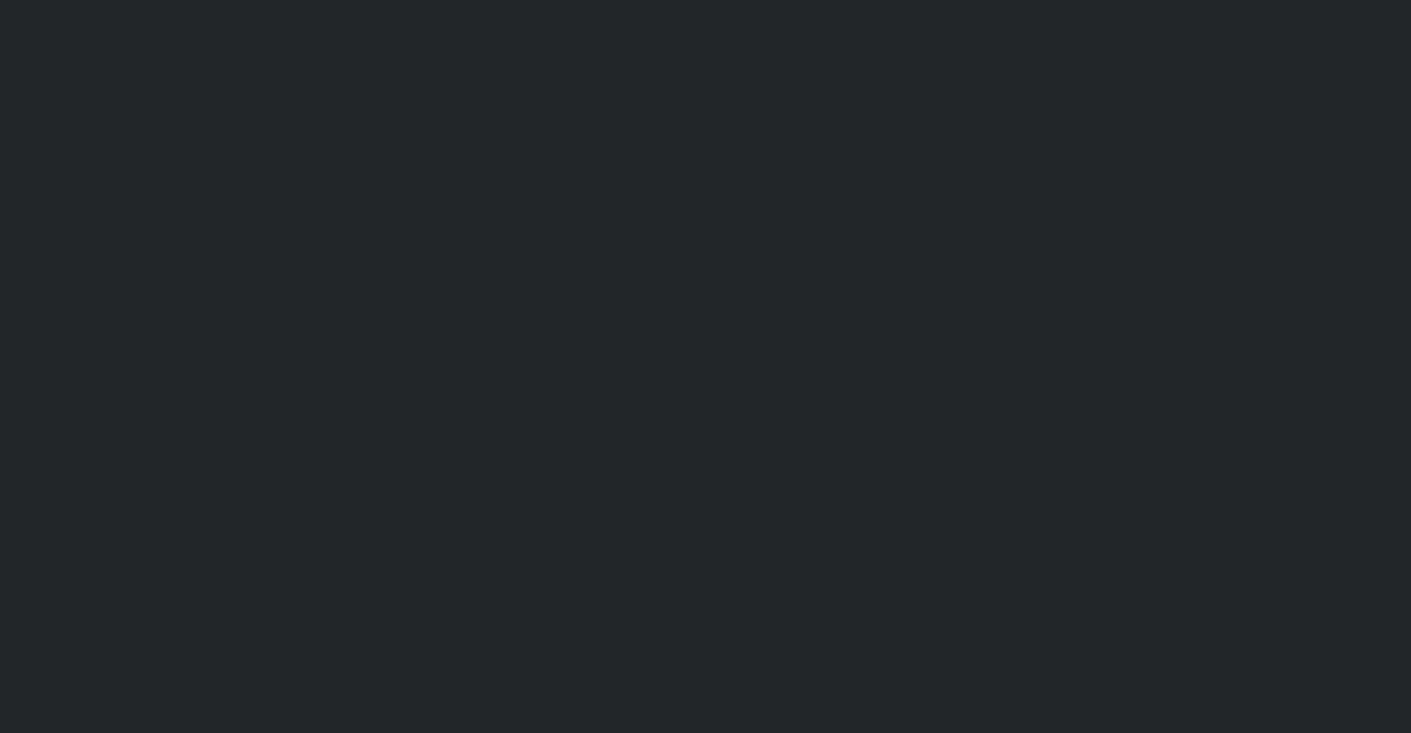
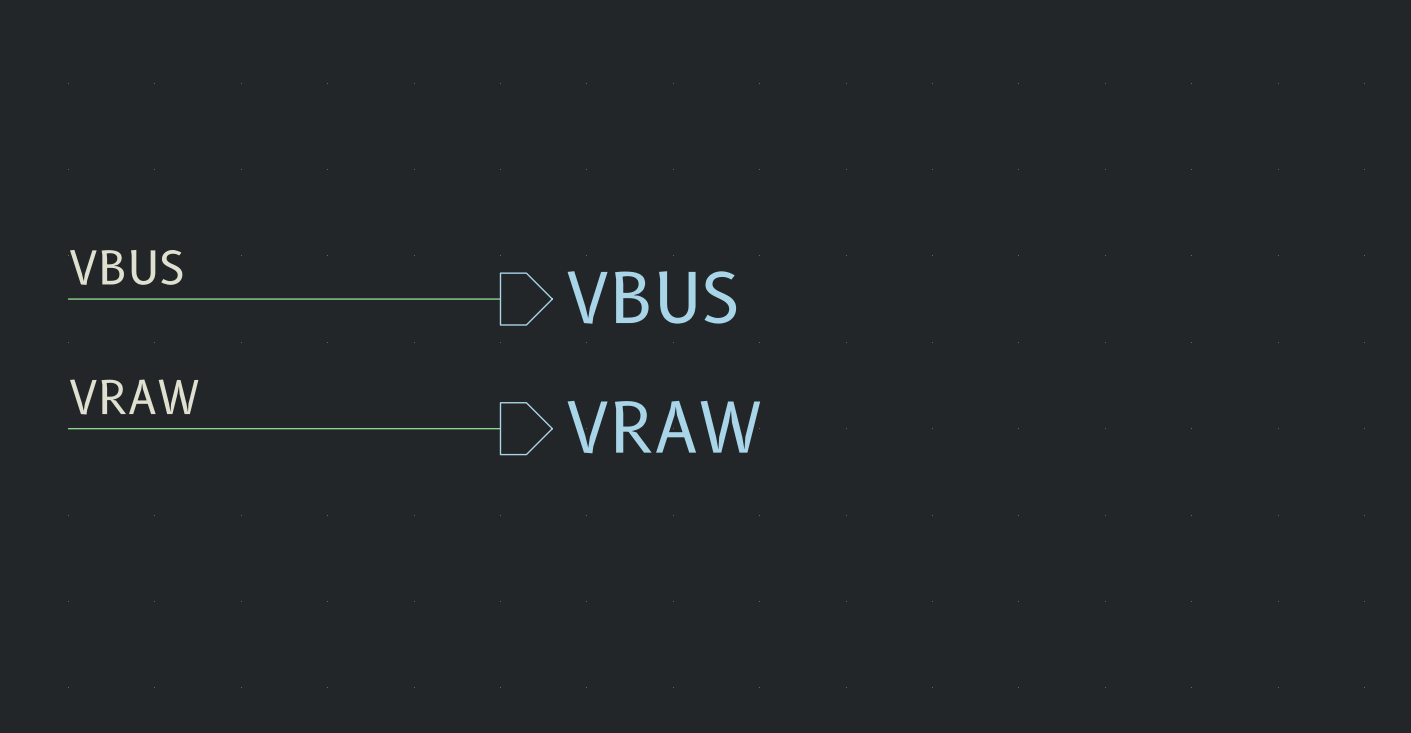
label: none -> VBUS (126, 267)
sheet pin: none -> VBUS (651, 297)
wire: none -> (68, 299) (500, 299)
label: none -> VRAW (134, 397)
sheet pin: none -> VRAW (663, 427)
wire: none -> (68, 428) (500, 428)

